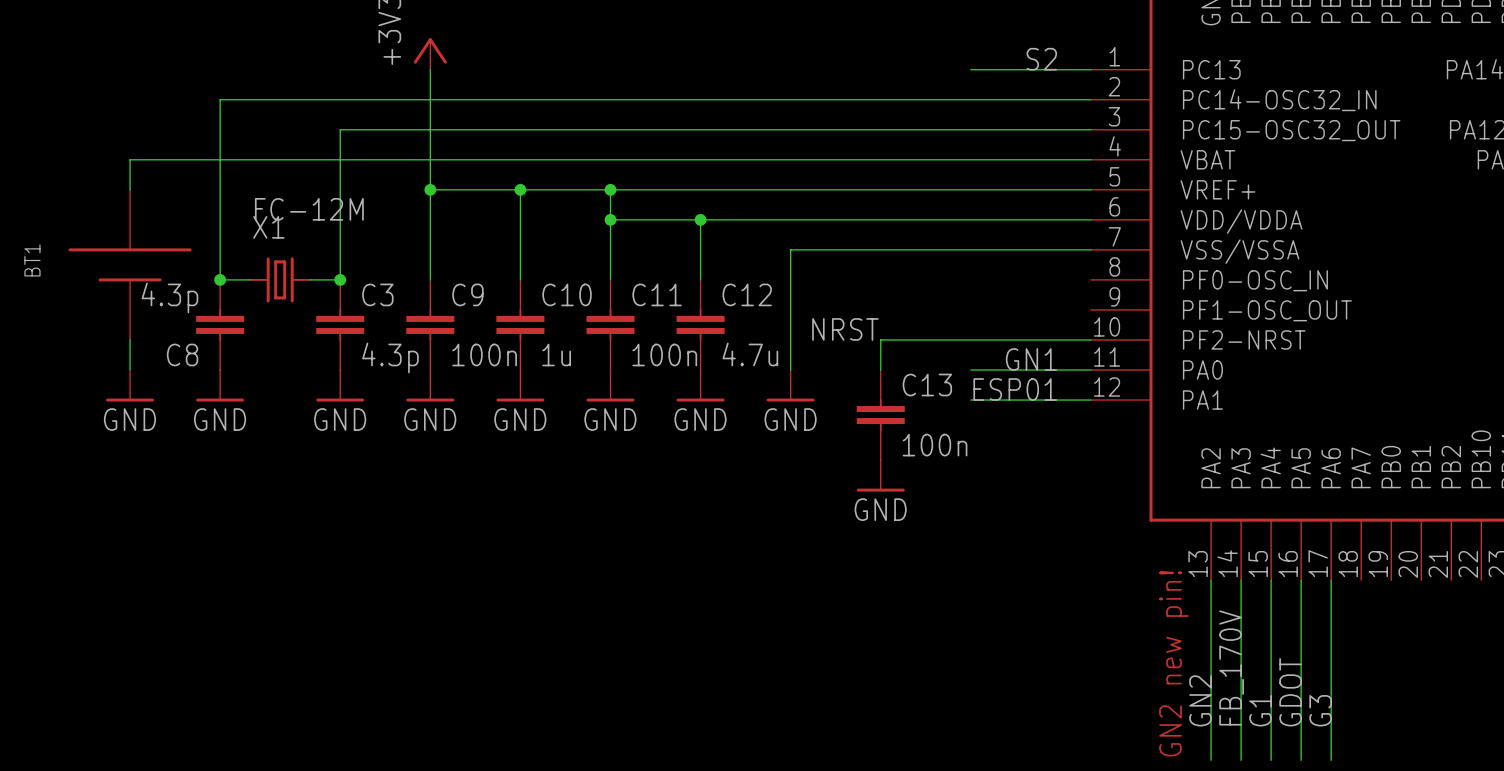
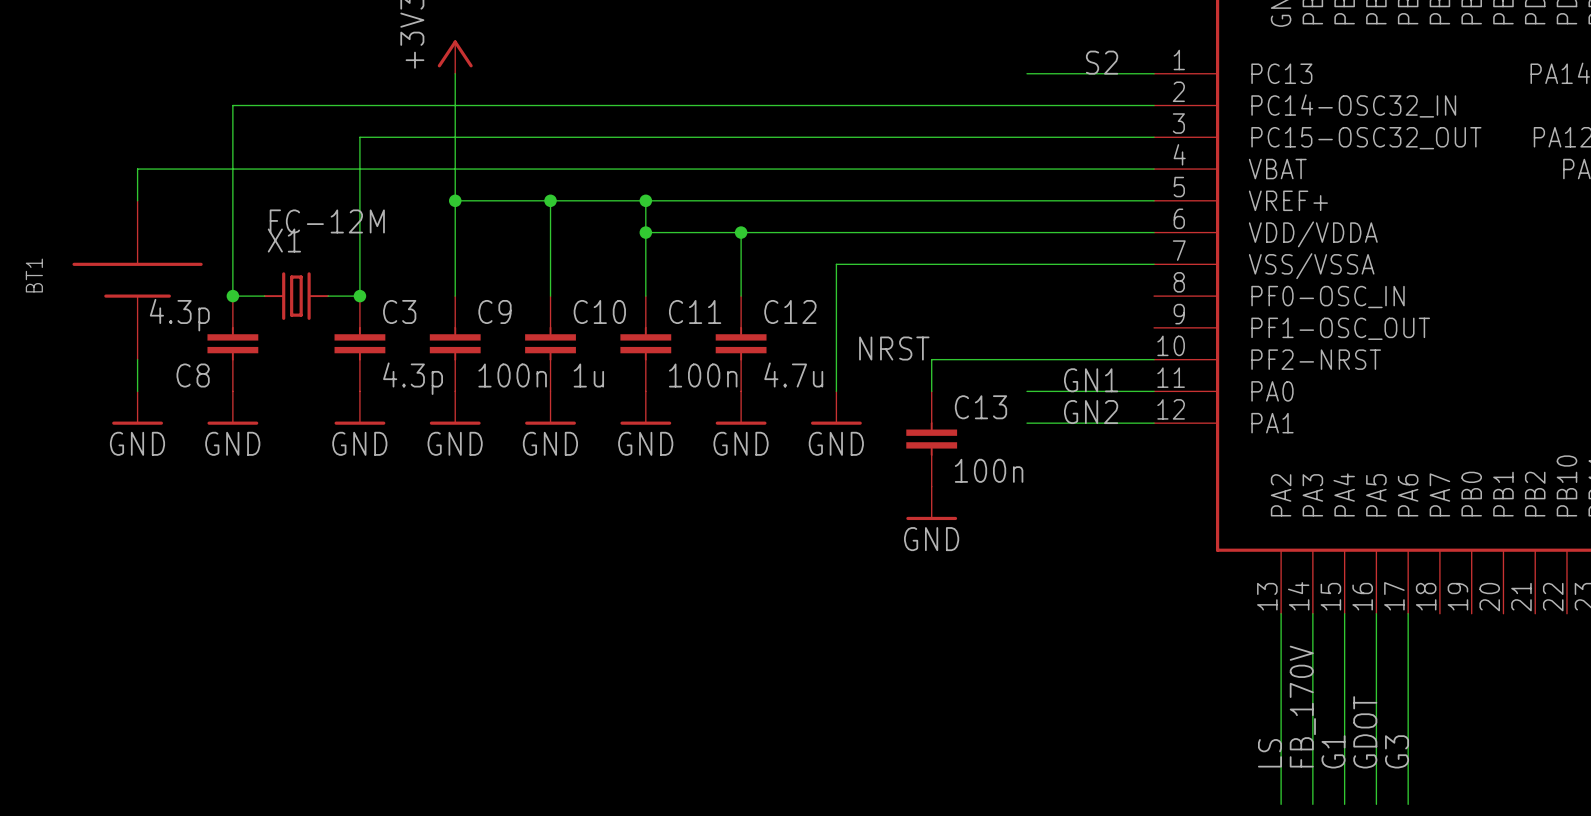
label: ESP01 (1015, 389) -> GN2 (1091, 412)
text: GN2 new pin! (1174, 663) -> none
label: GN2 (1200, 700) -> LS (1269, 753)

